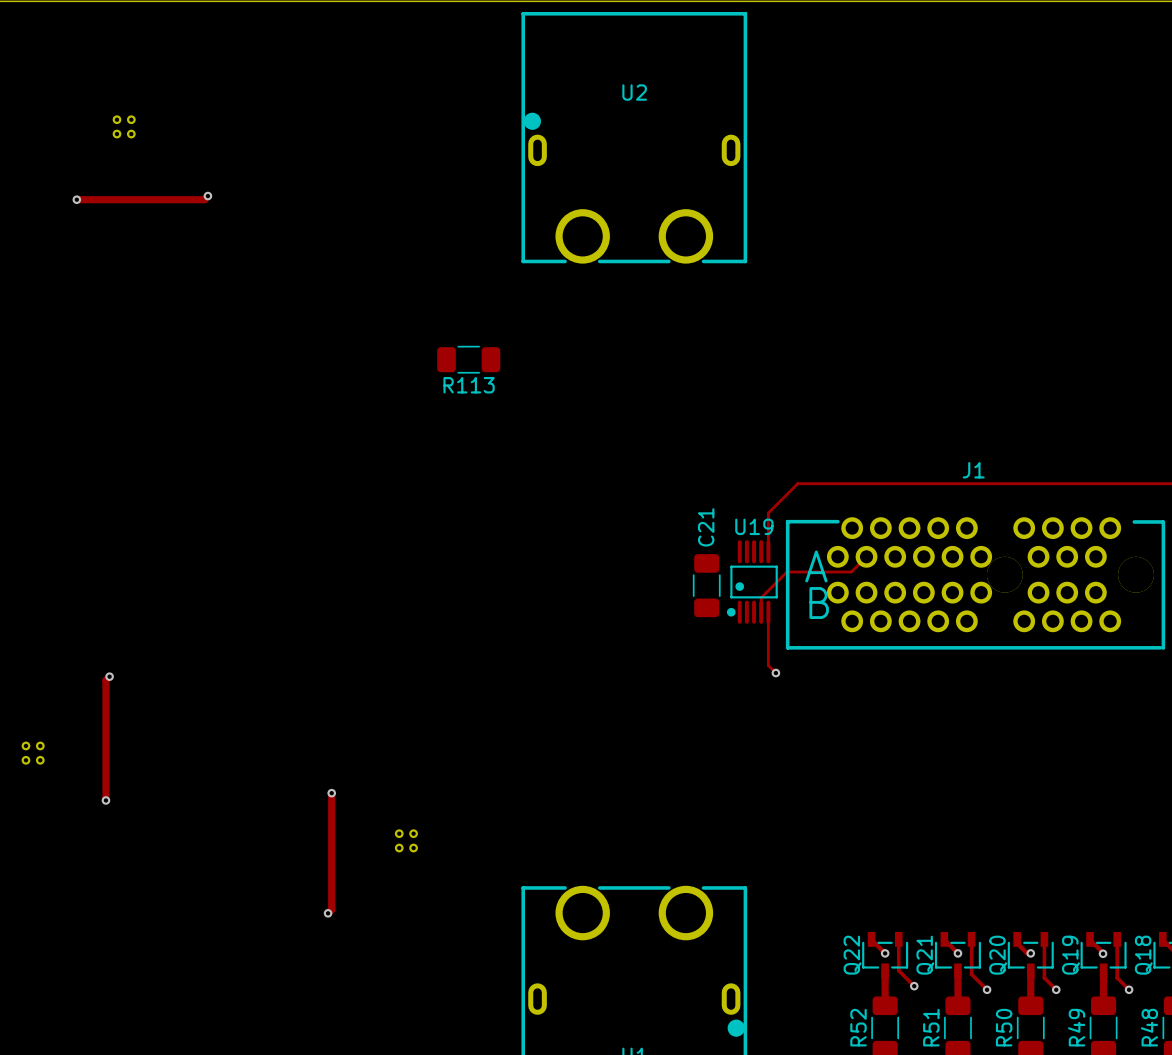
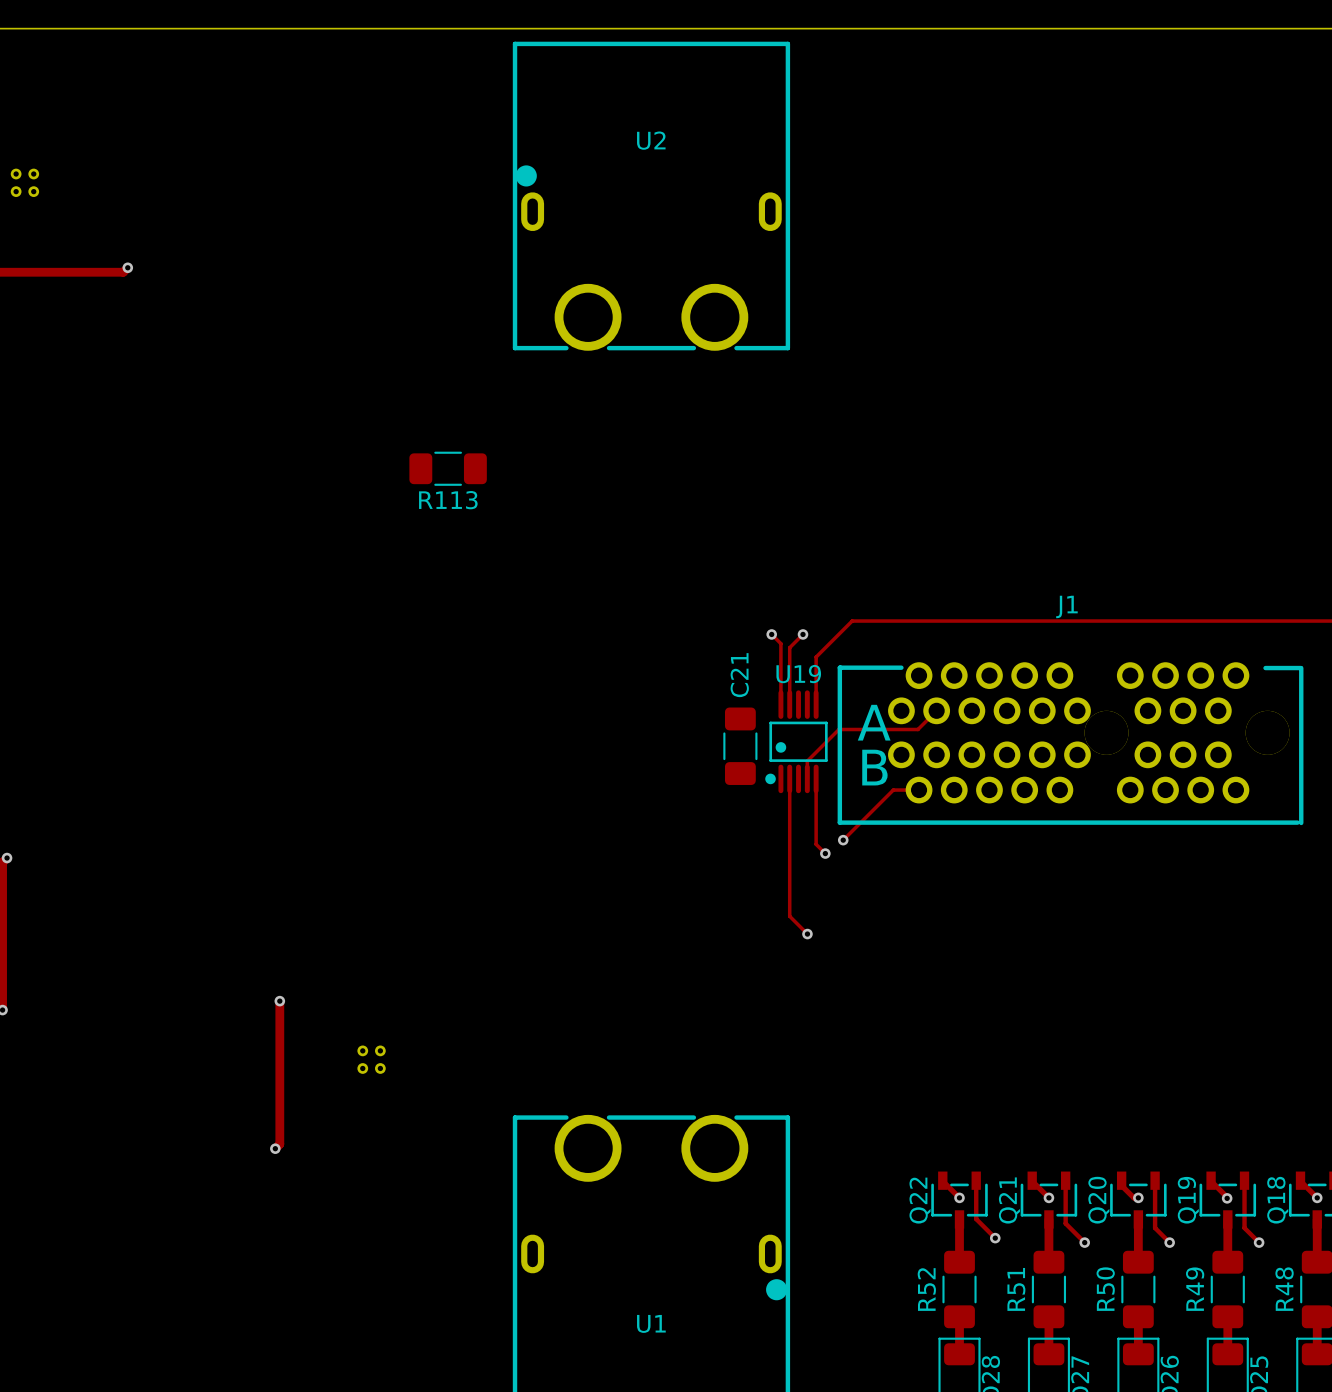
track: none -> (771, 634) (780, 643) (780, 704)
via: none -> (771, 634)
track: none -> (802, 634) (789, 647) (789, 704)
via: none -> (802, 634)
track: none -> (789, 778) (789, 916) (807, 934)
track: none -> (919, 790) (893, 790) (843, 840)
via: none -> (843, 840)
via: none -> (807, 934)

